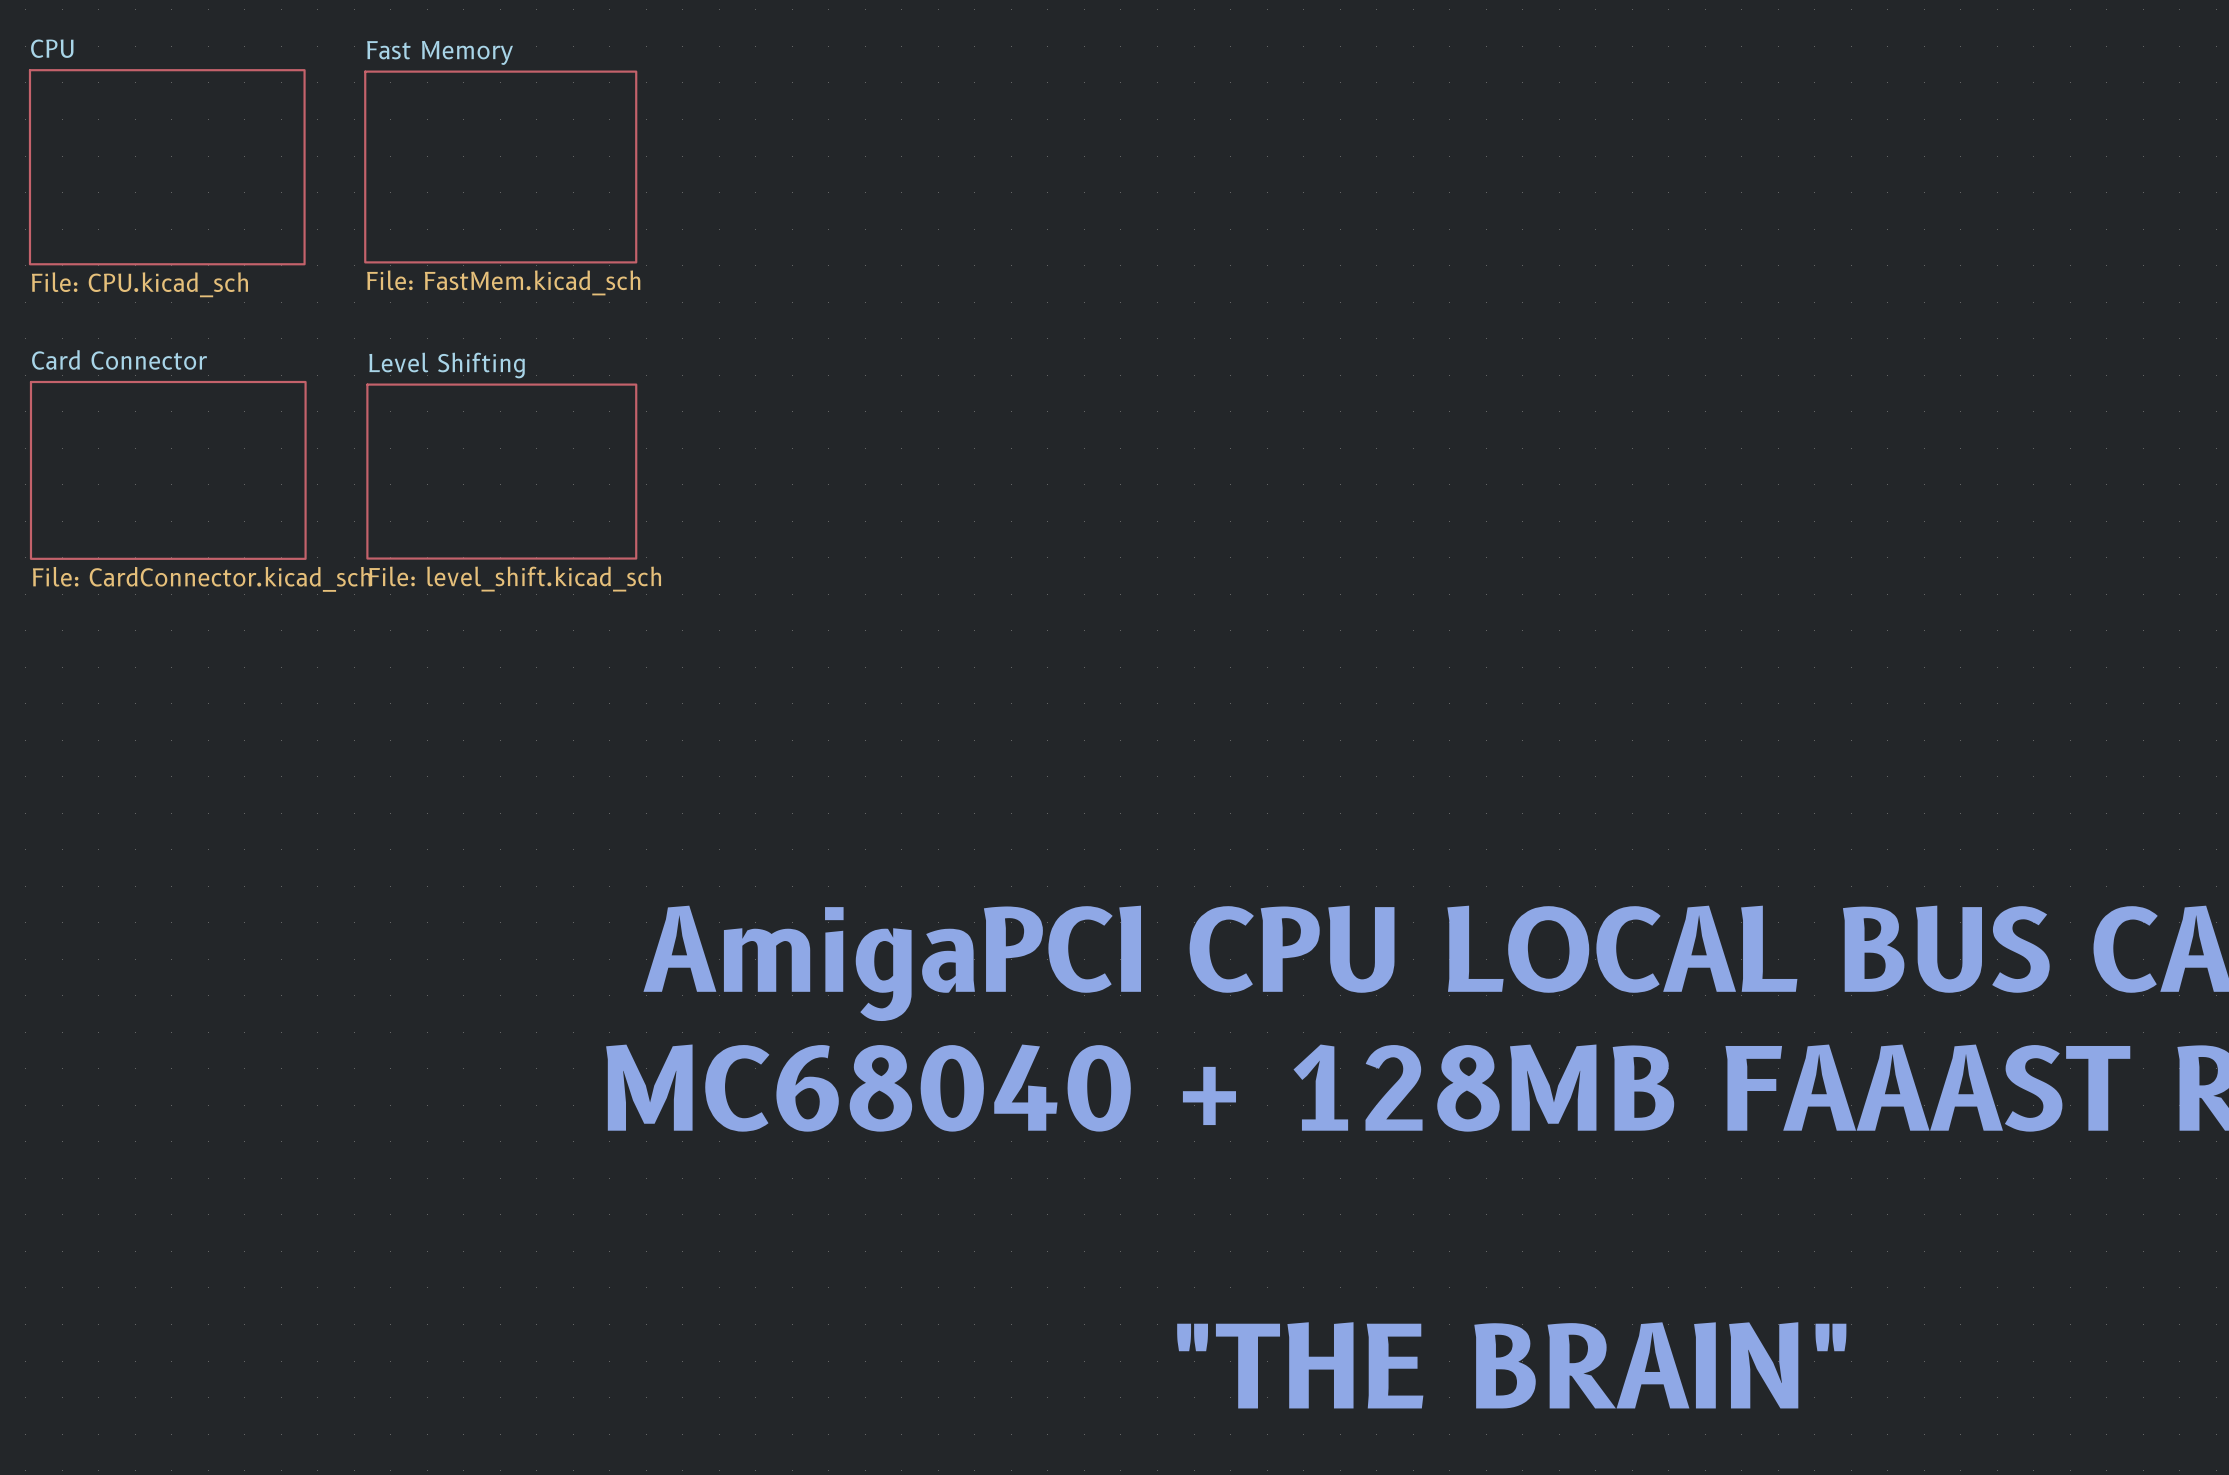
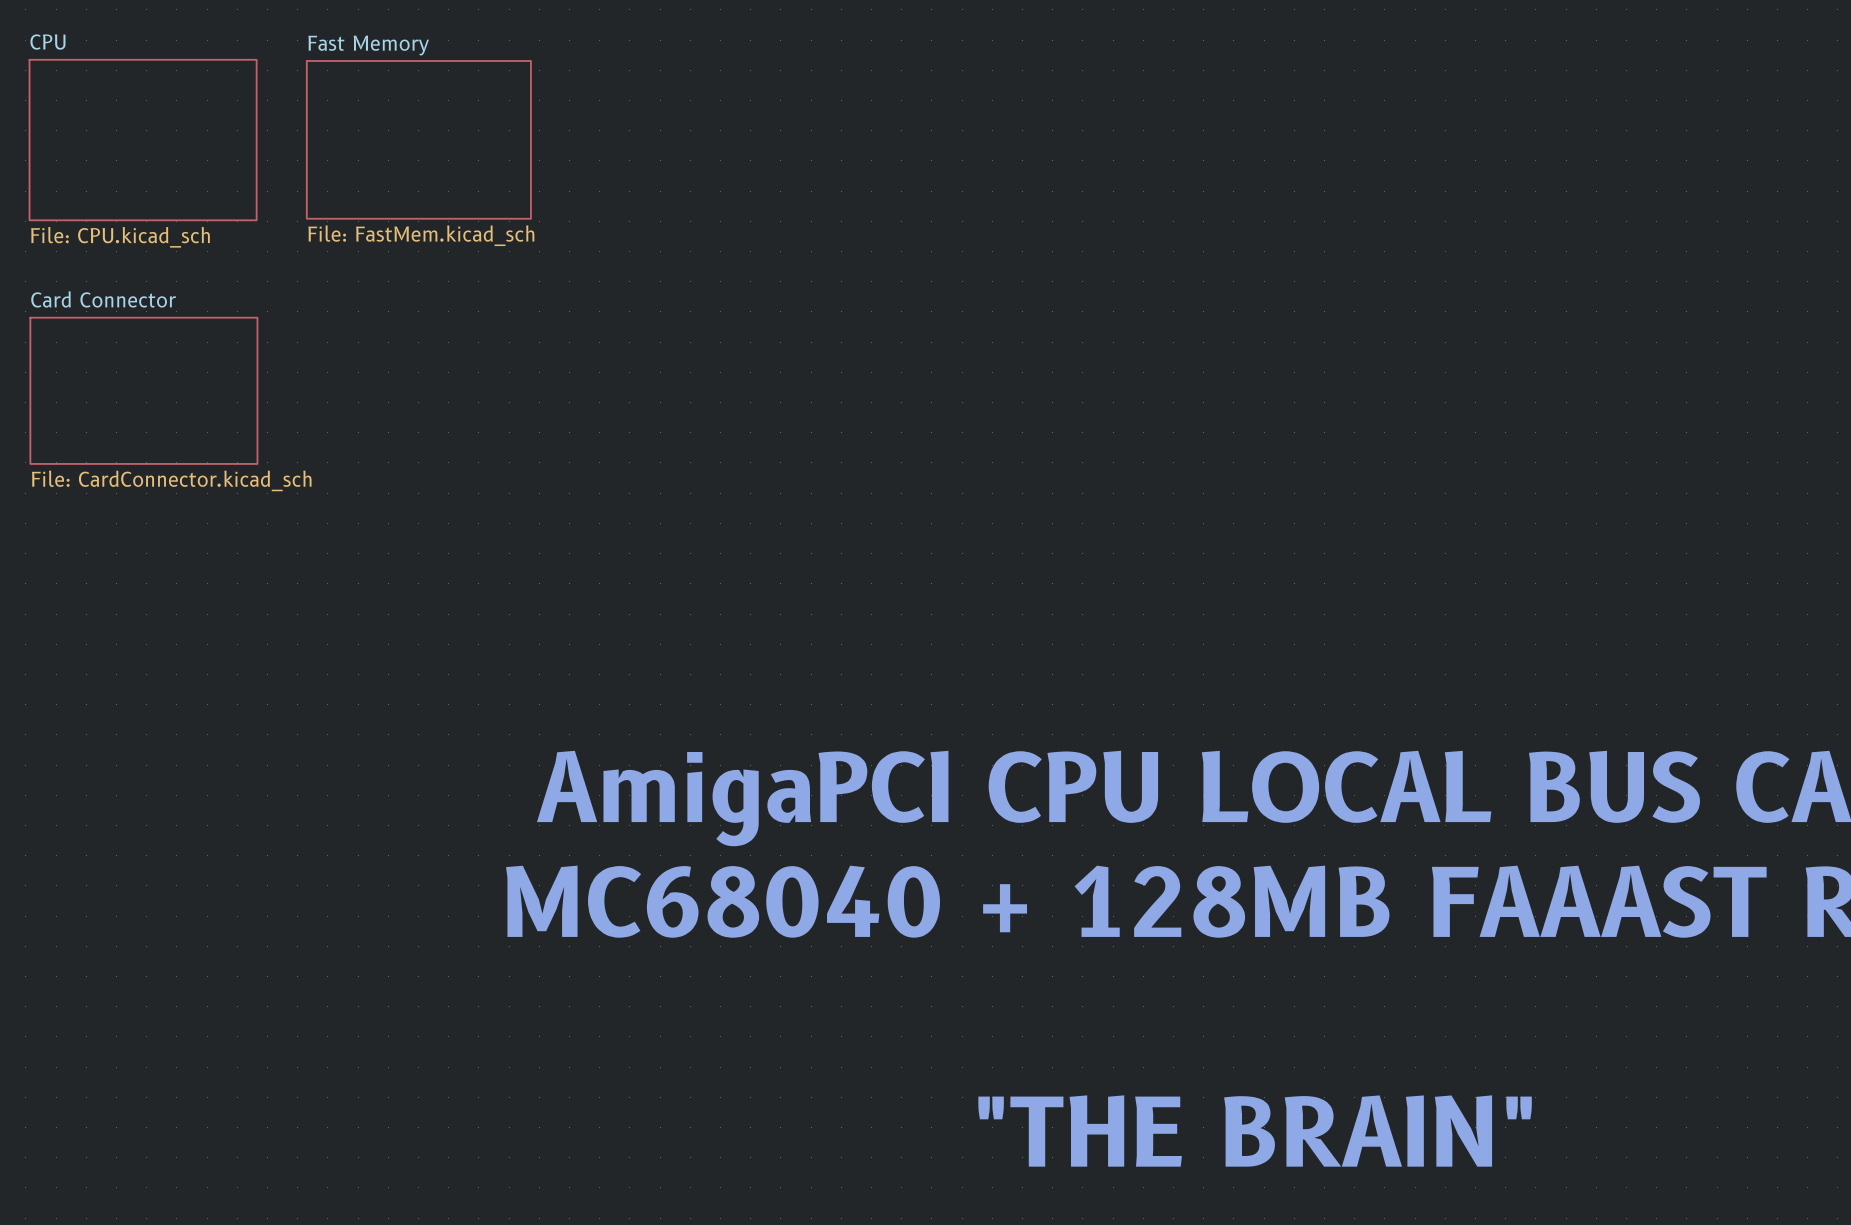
sheet Level Shifting: File: level_shift.kicad_sch (501, 471) -> none

